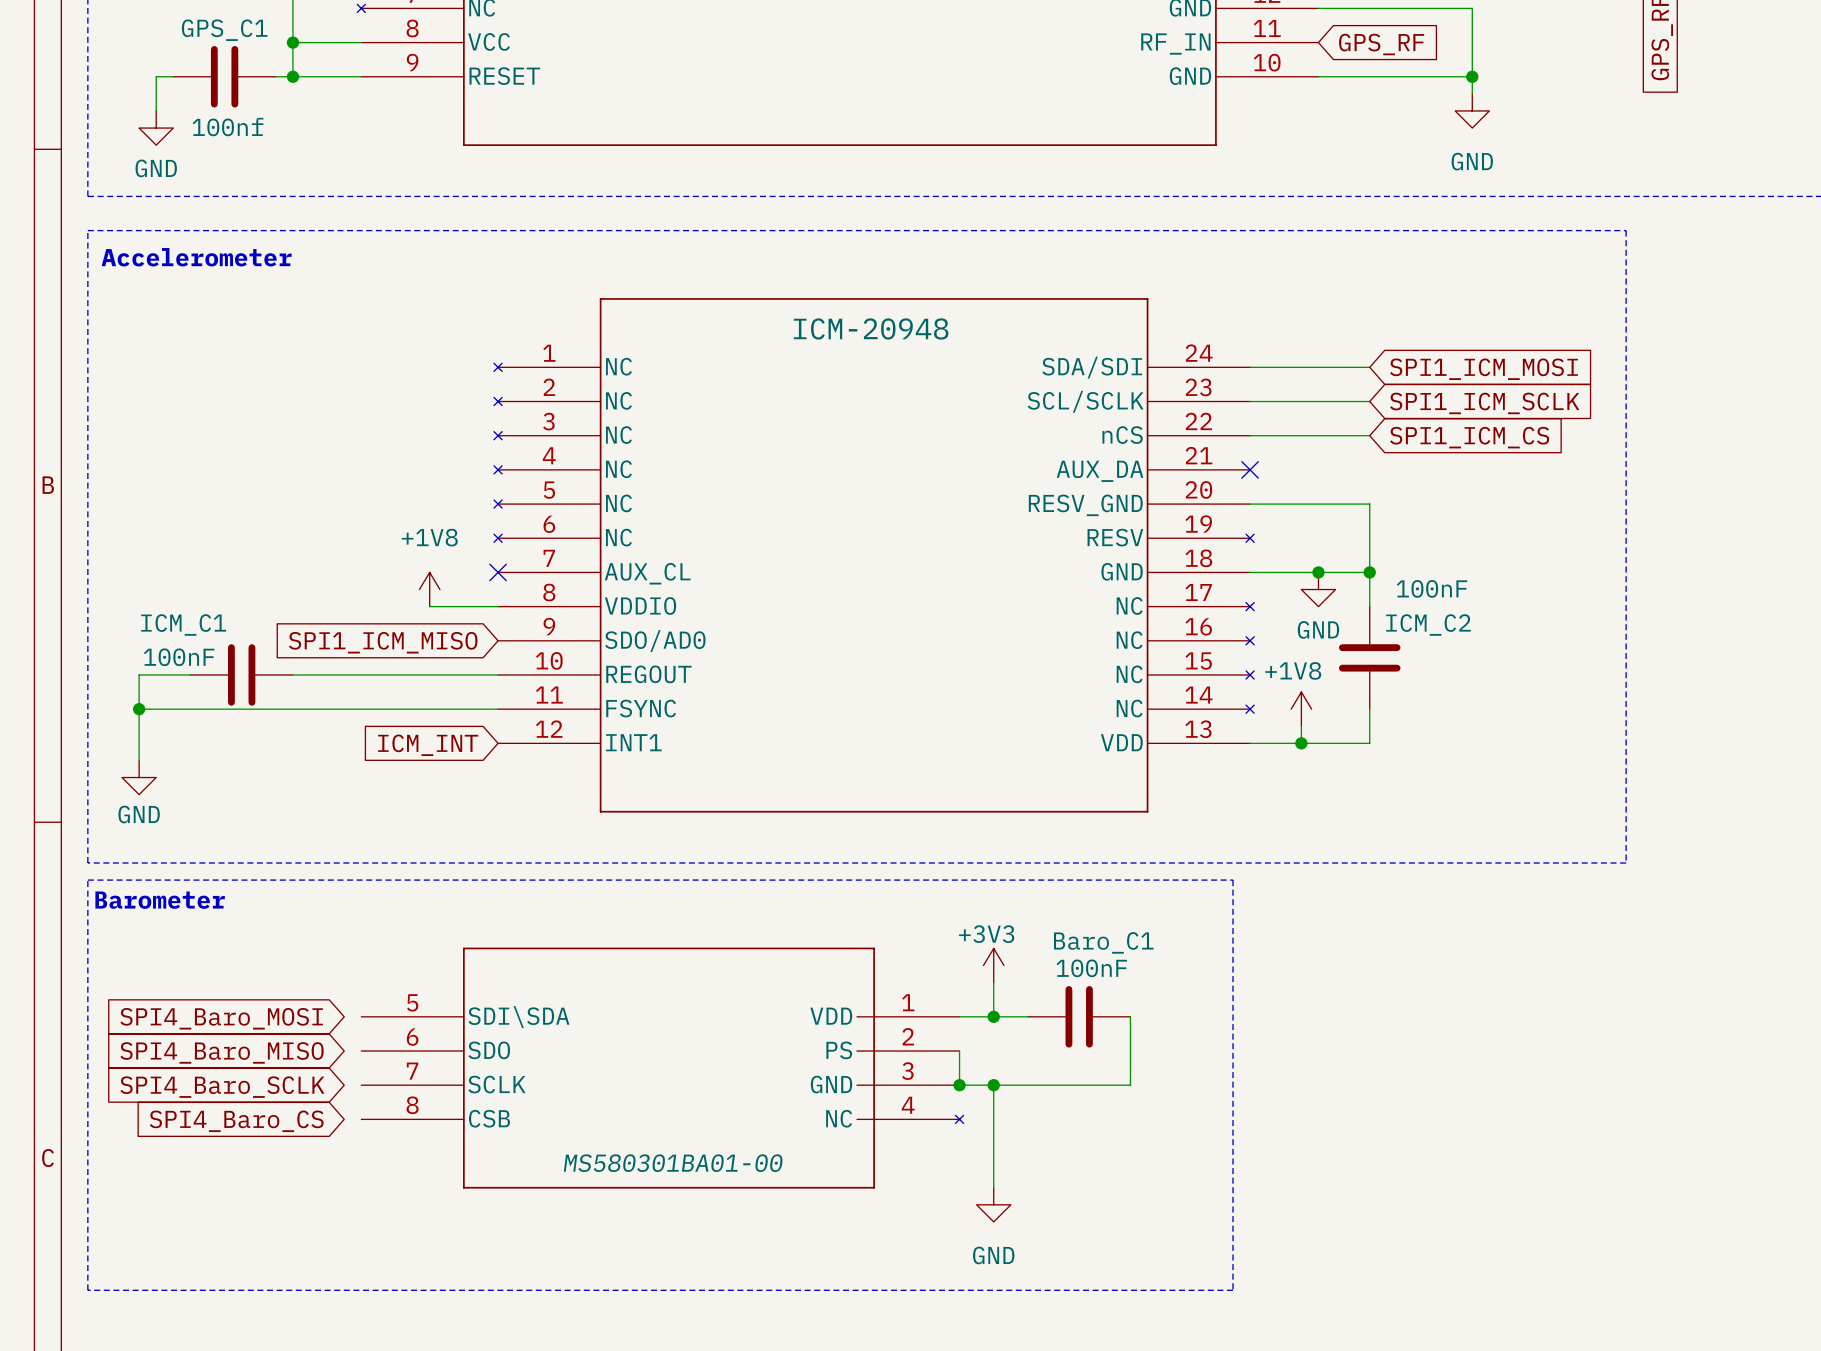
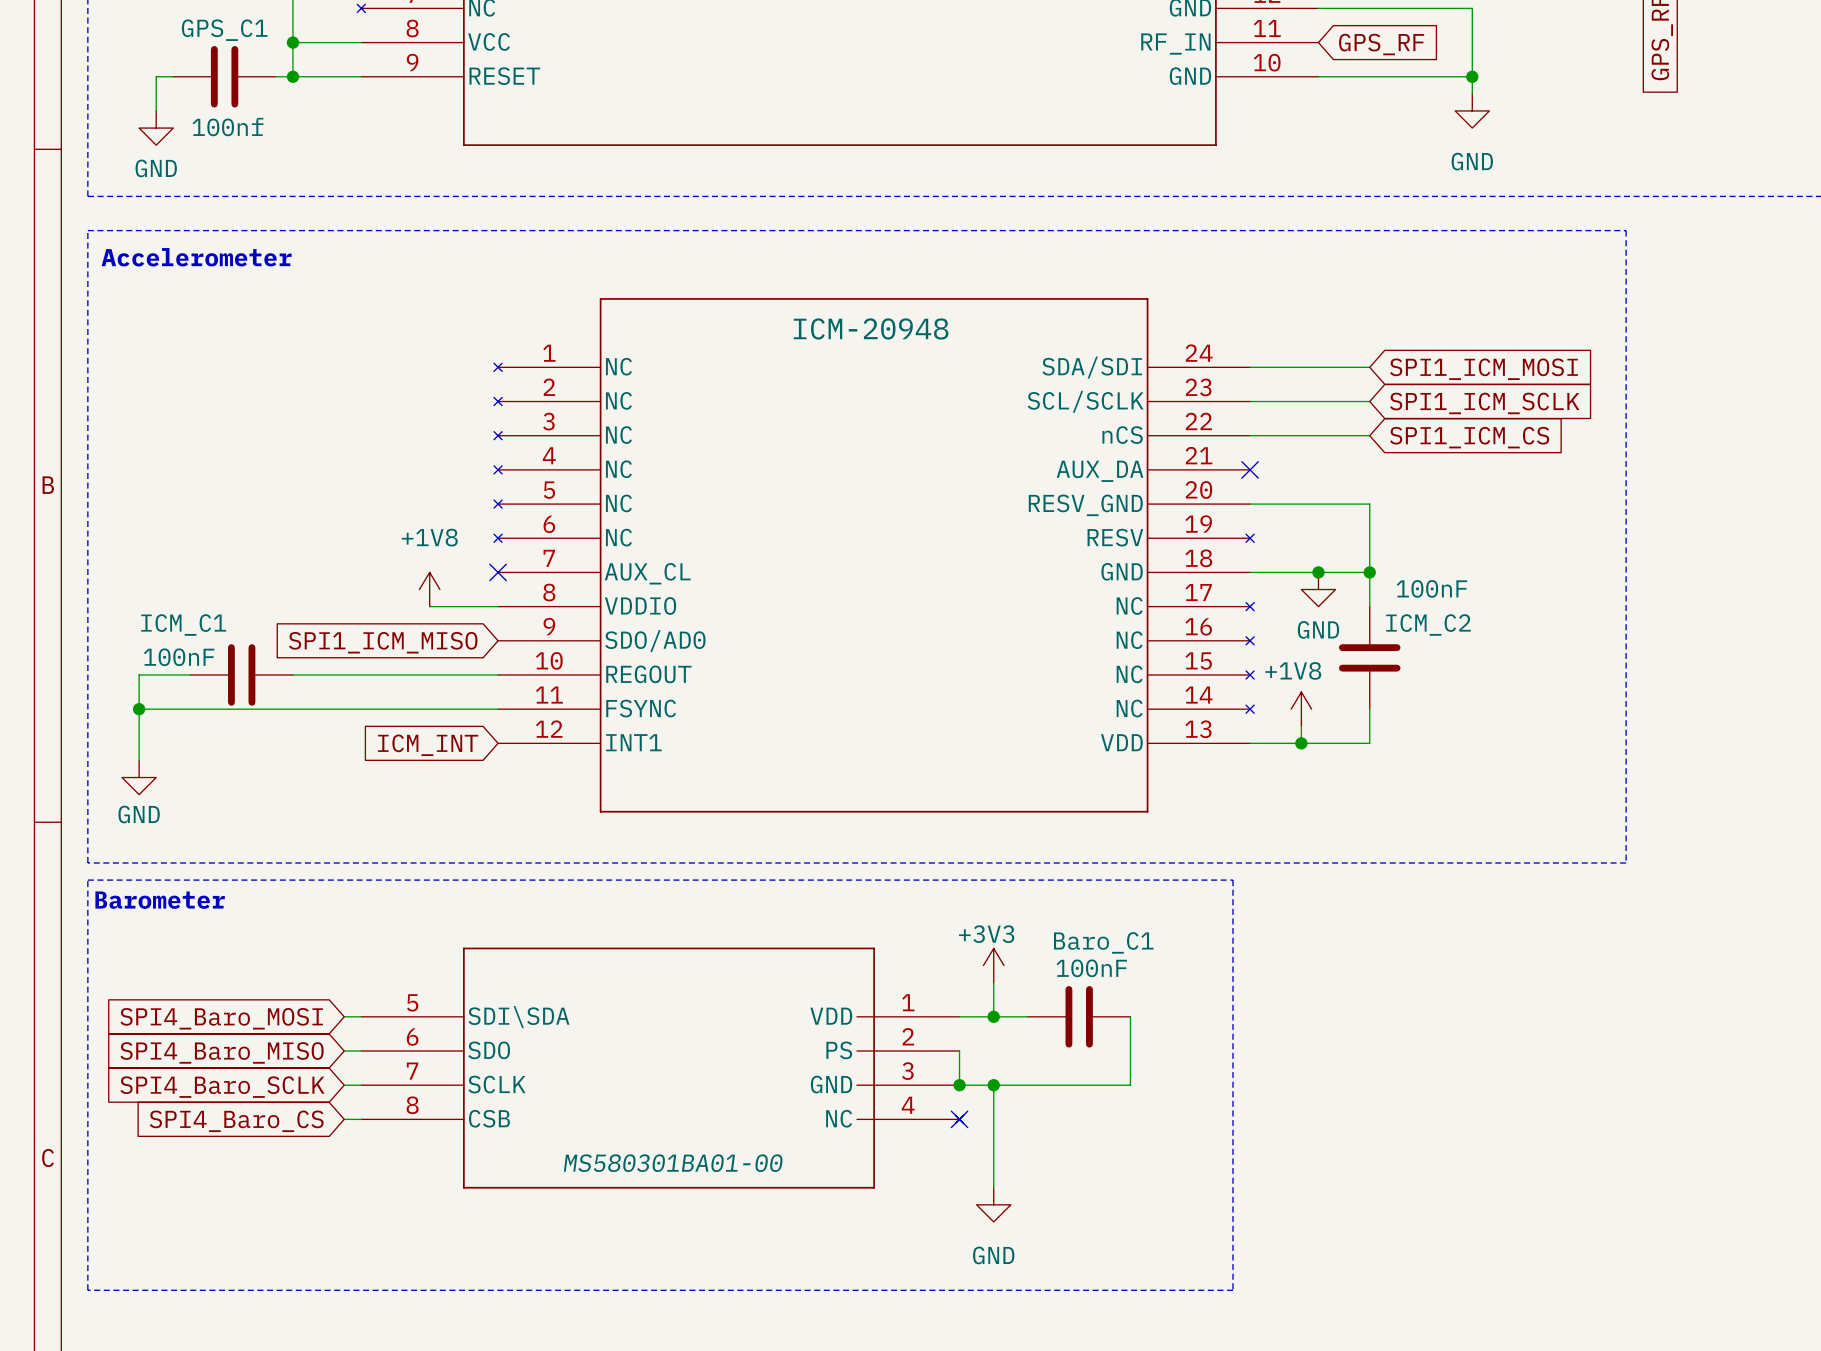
wire: none -> (344, 1016) (361, 1016)
wire: none -> (344, 1051) (361, 1051)
wire: none -> (344, 1085) (361, 1085)
wire: none -> (344, 1119) (361, 1119)
no-connect mark: none -> (959, 1119)

